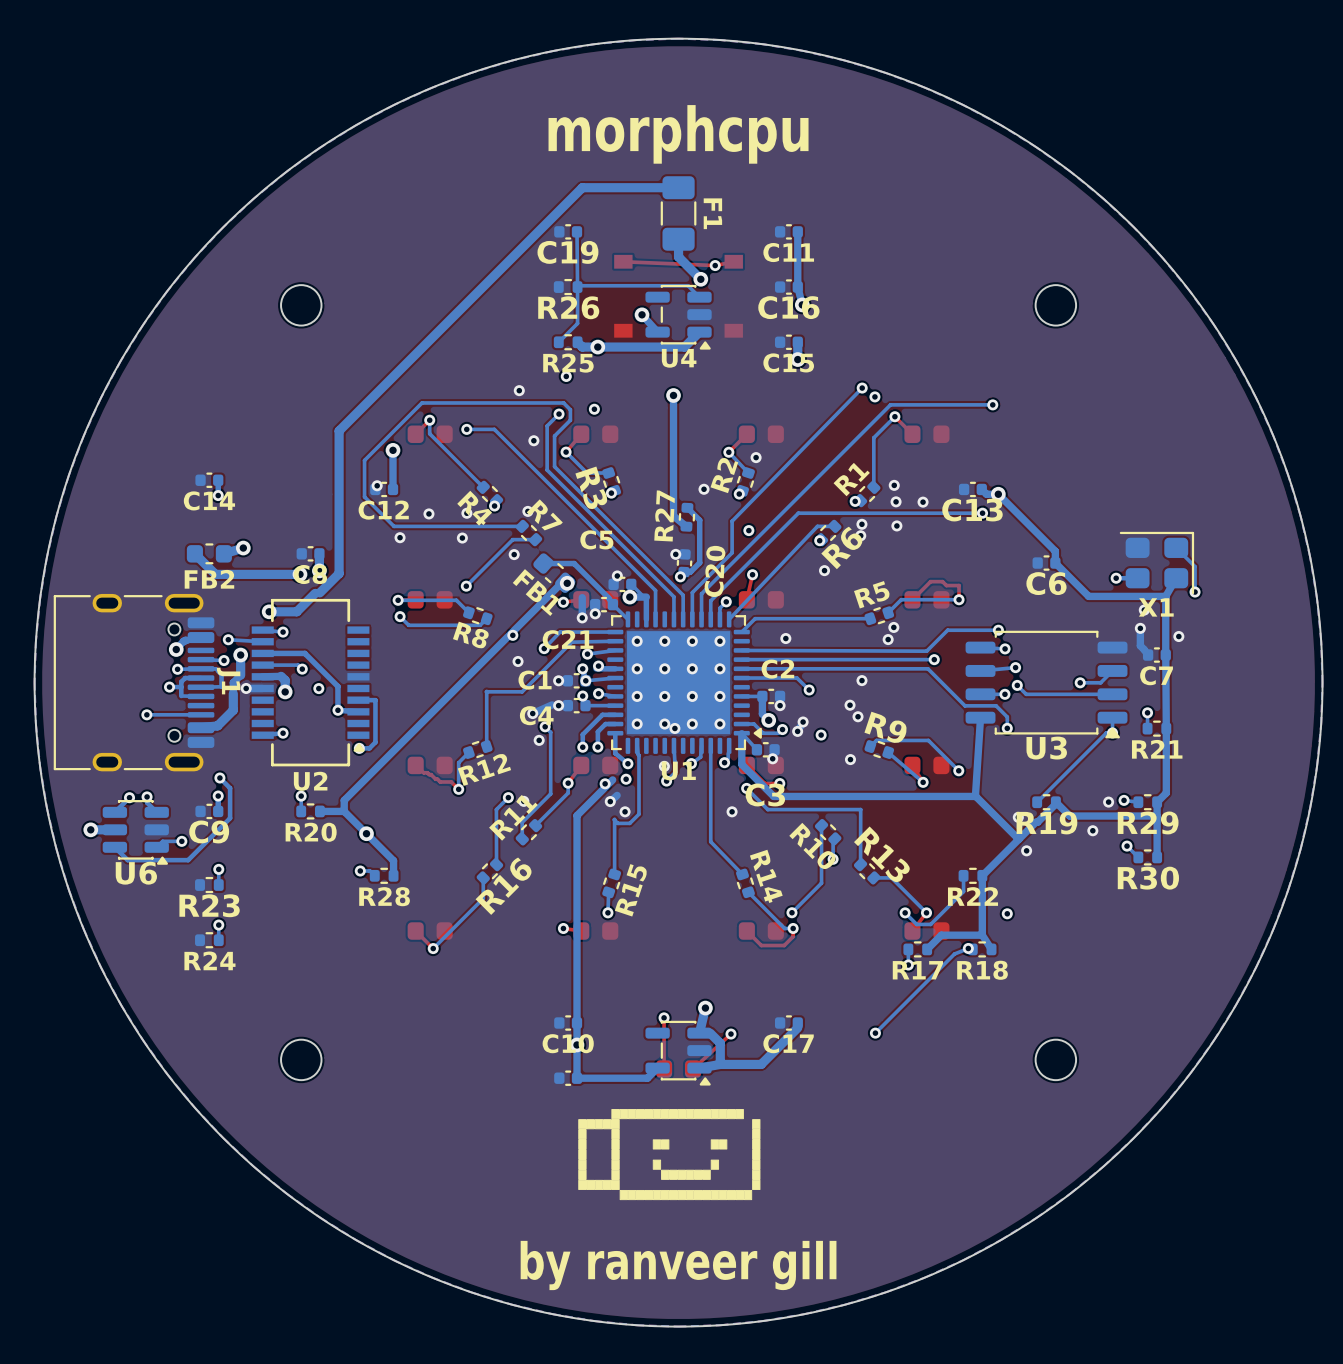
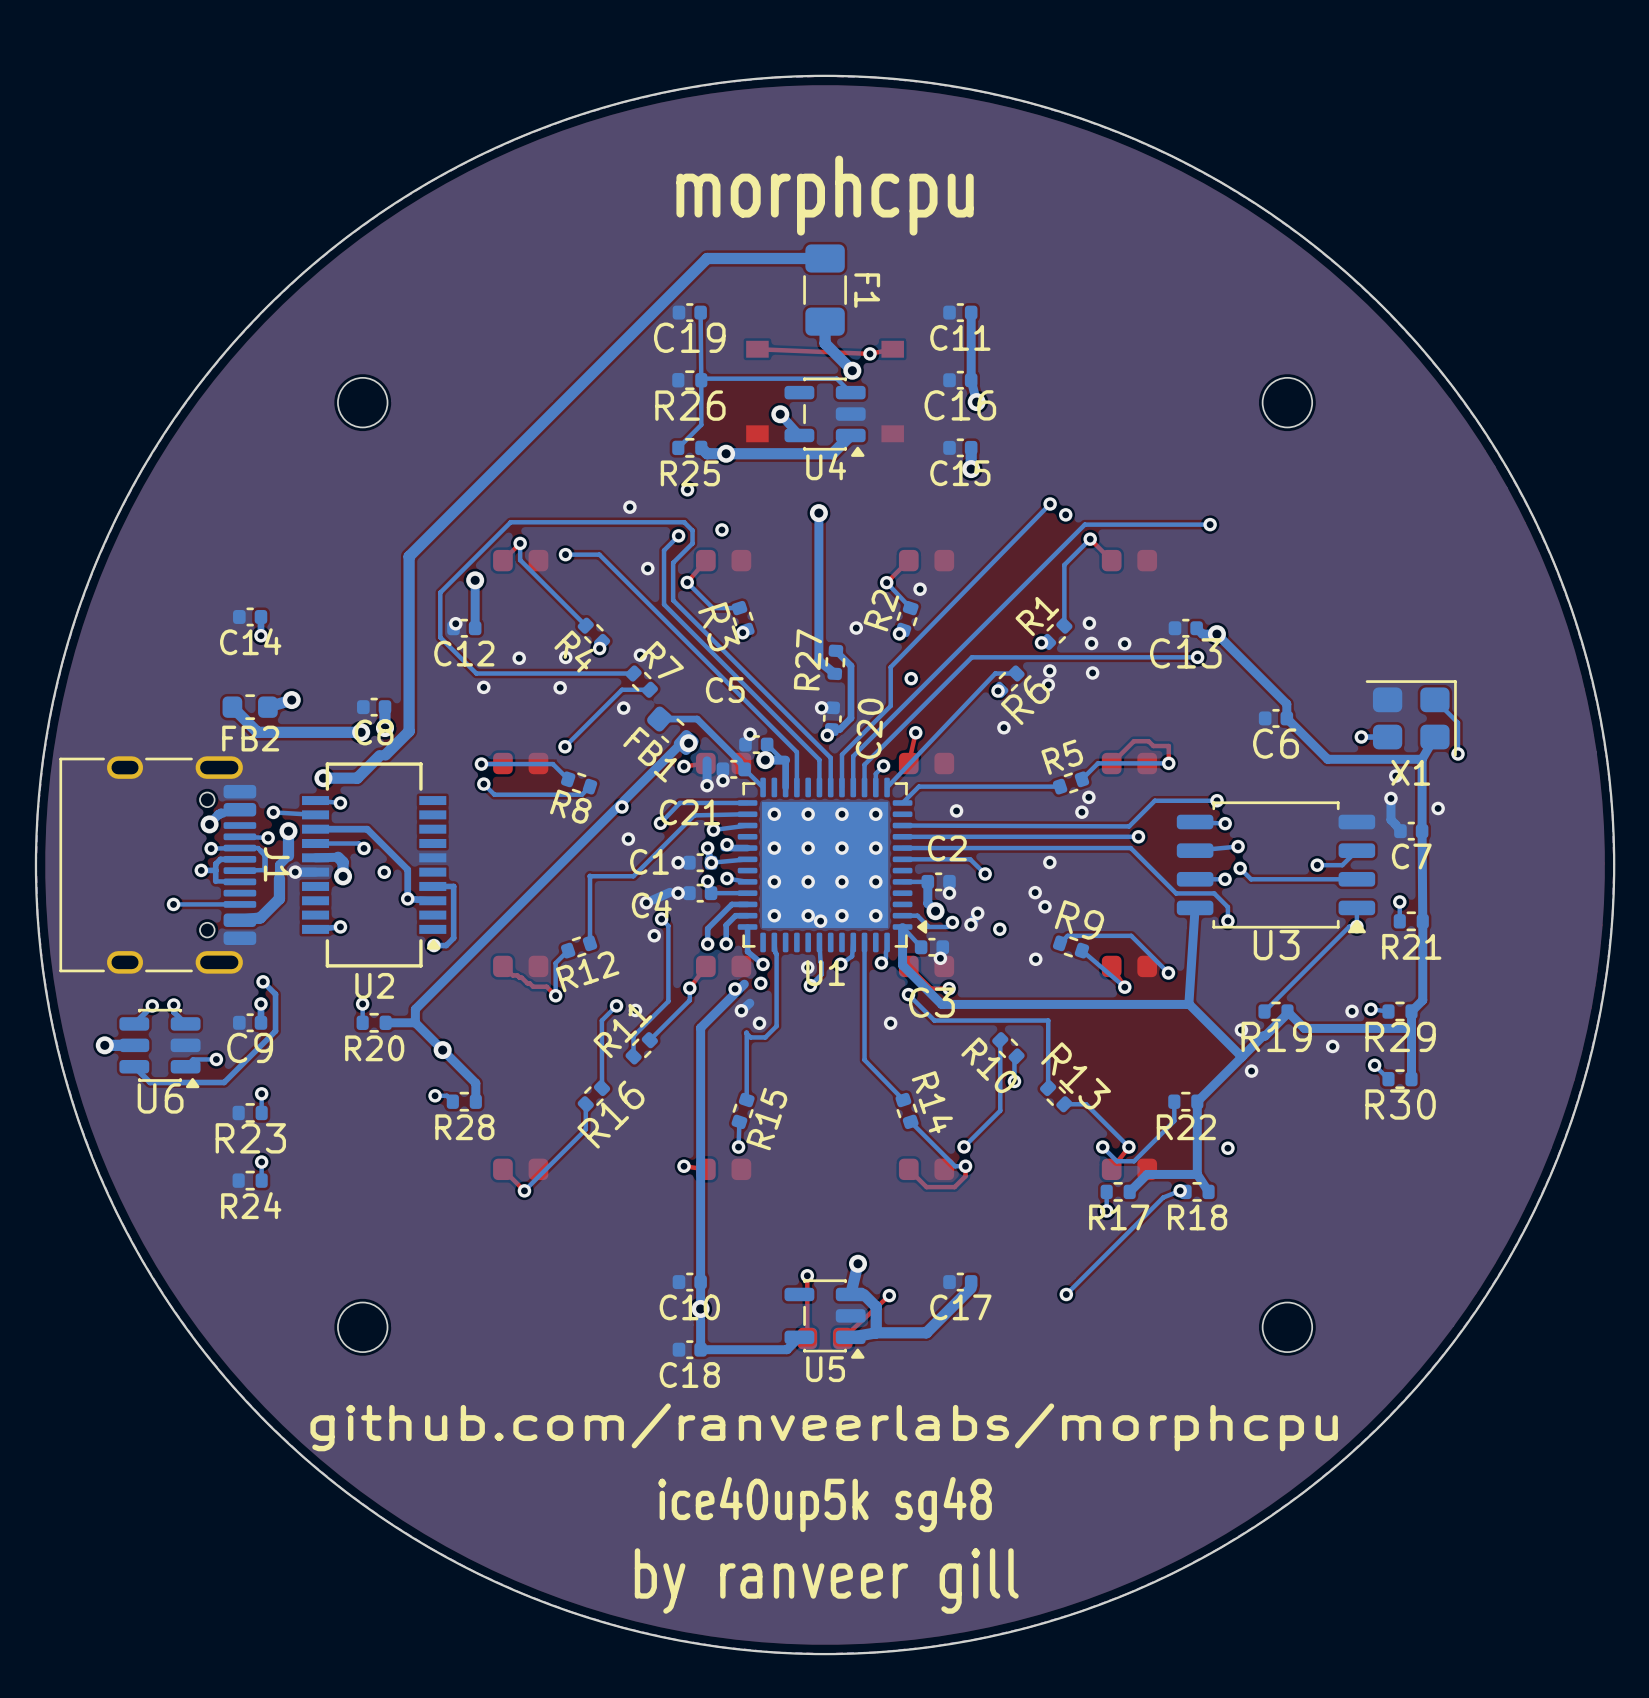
U5 name: none -> U5 (825, 1369)
C18 name: none -> C18 (689, 1375)
drawing: [578, 1109, 761, 1201] -> none
text: none -> github.com/ranveerlabs/morphcpu (824, 1427)
text: none -> ice40up5k sg48 (825, 1504)

